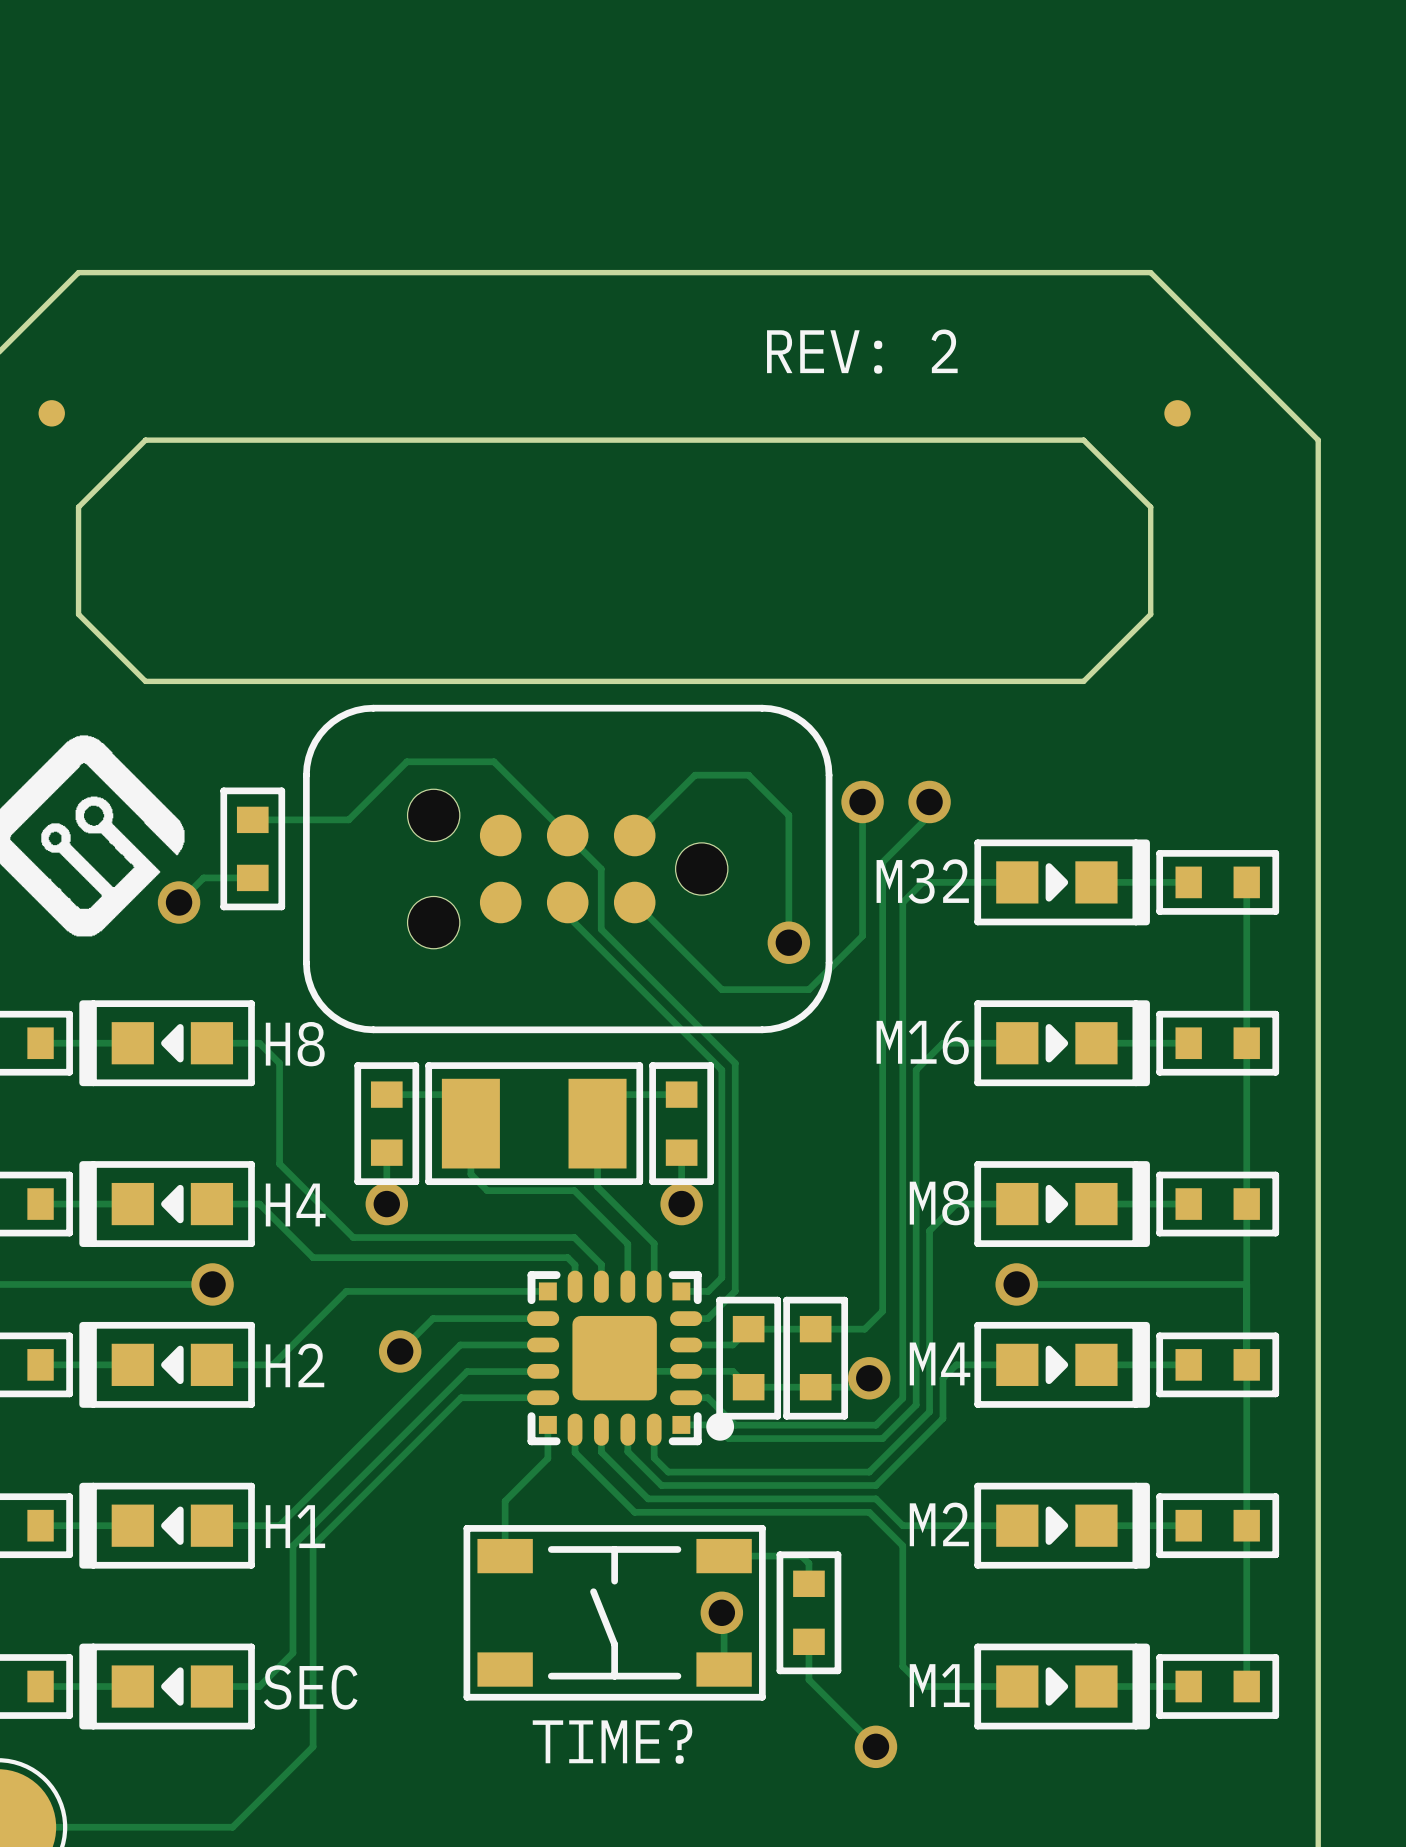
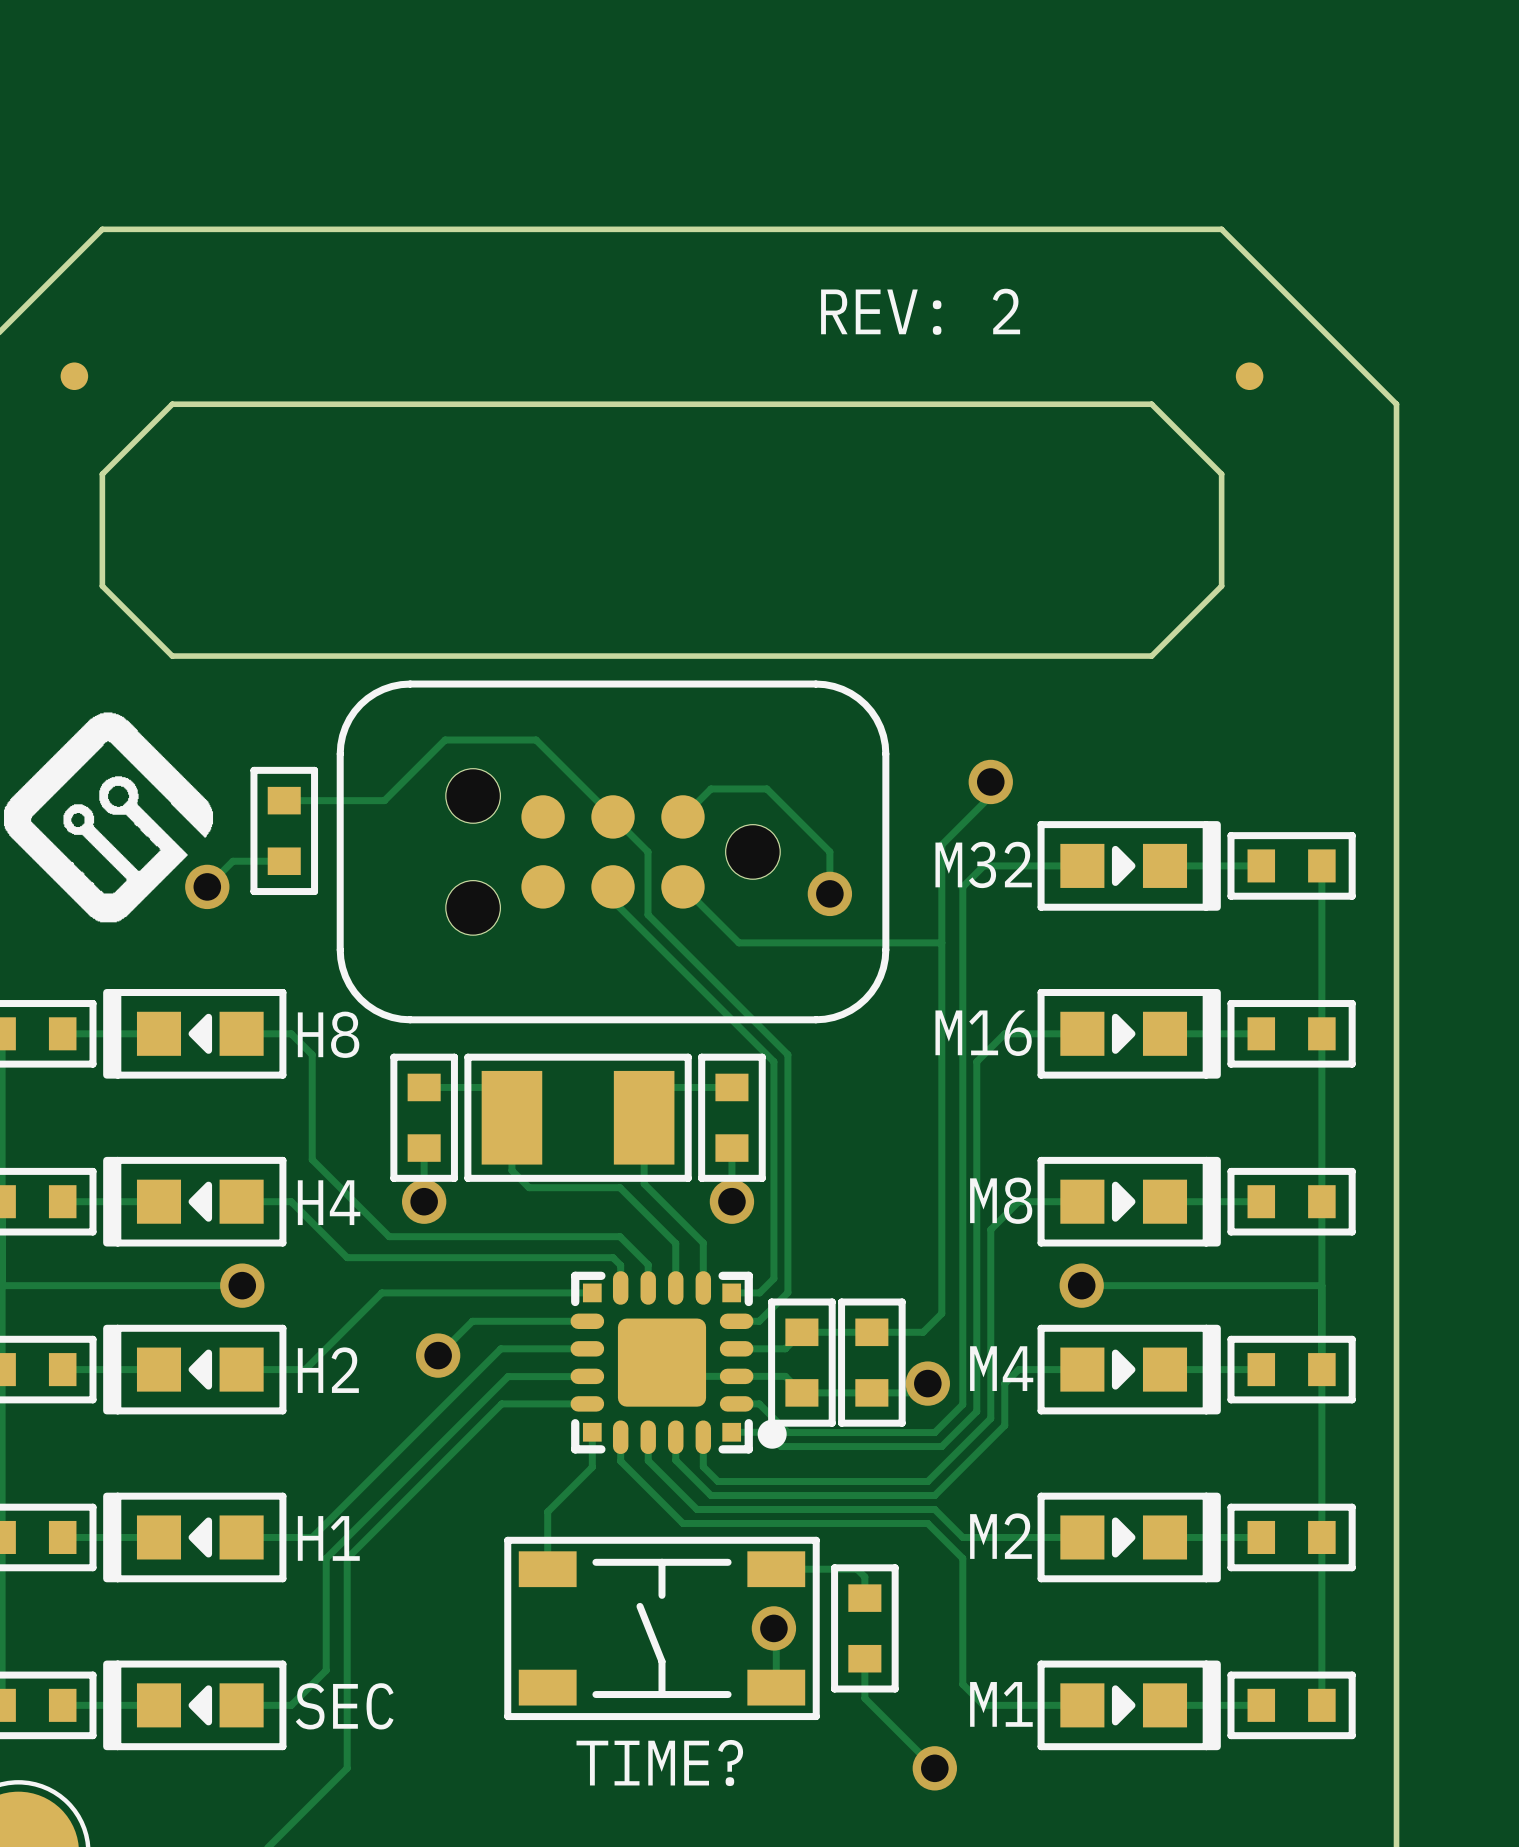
track: (862, 801) (862, 936) (808, 989) (721, 989) (688, 956) -> (941, 942) (738, 942)
via: (862, 801) -> none
track: (661, 808) (695, 775) (748, 775) (788, 815) (788, 942) -> (710, 788) (766, 788) (829, 851) (829, 893)
via position: (788, 942) -> (829, 893)

